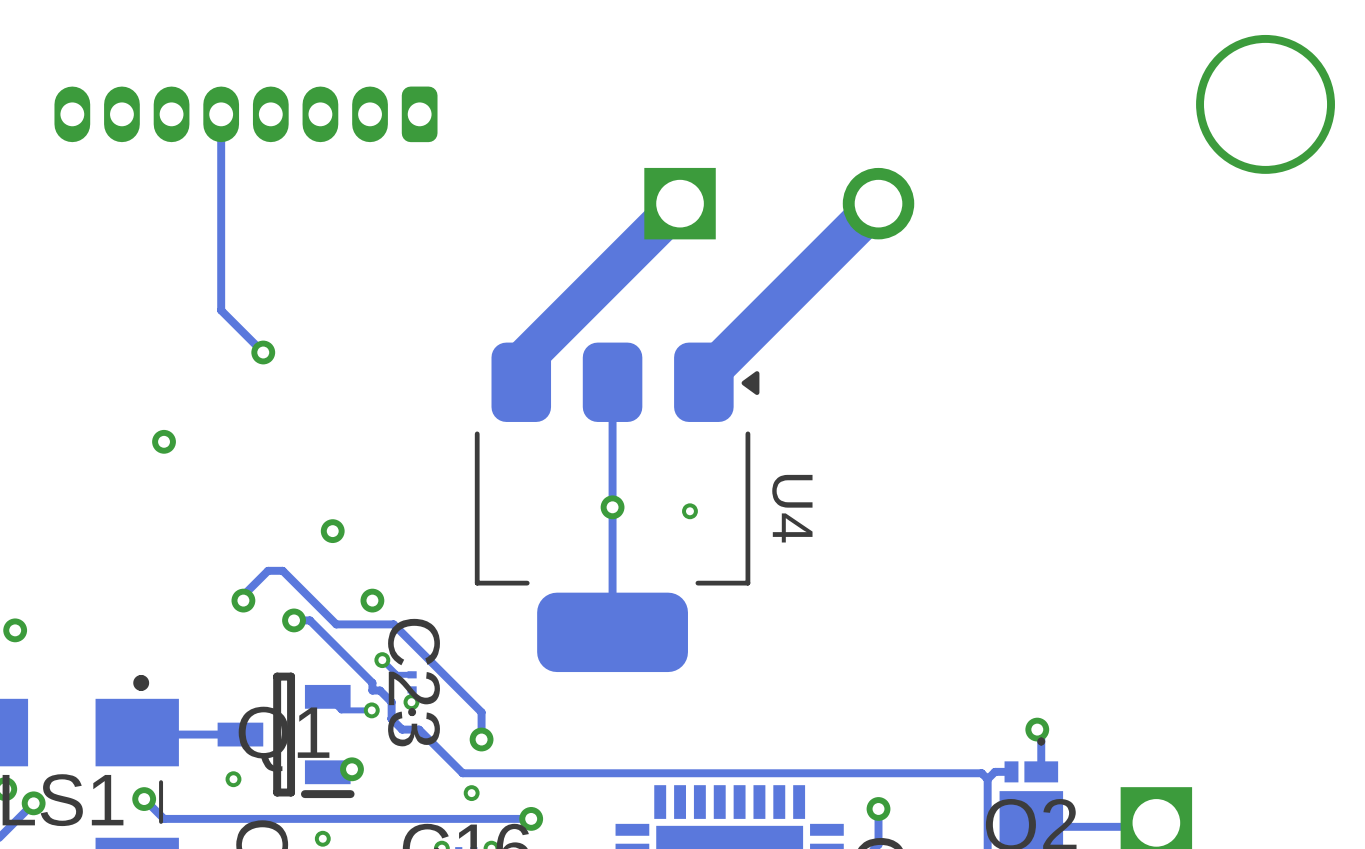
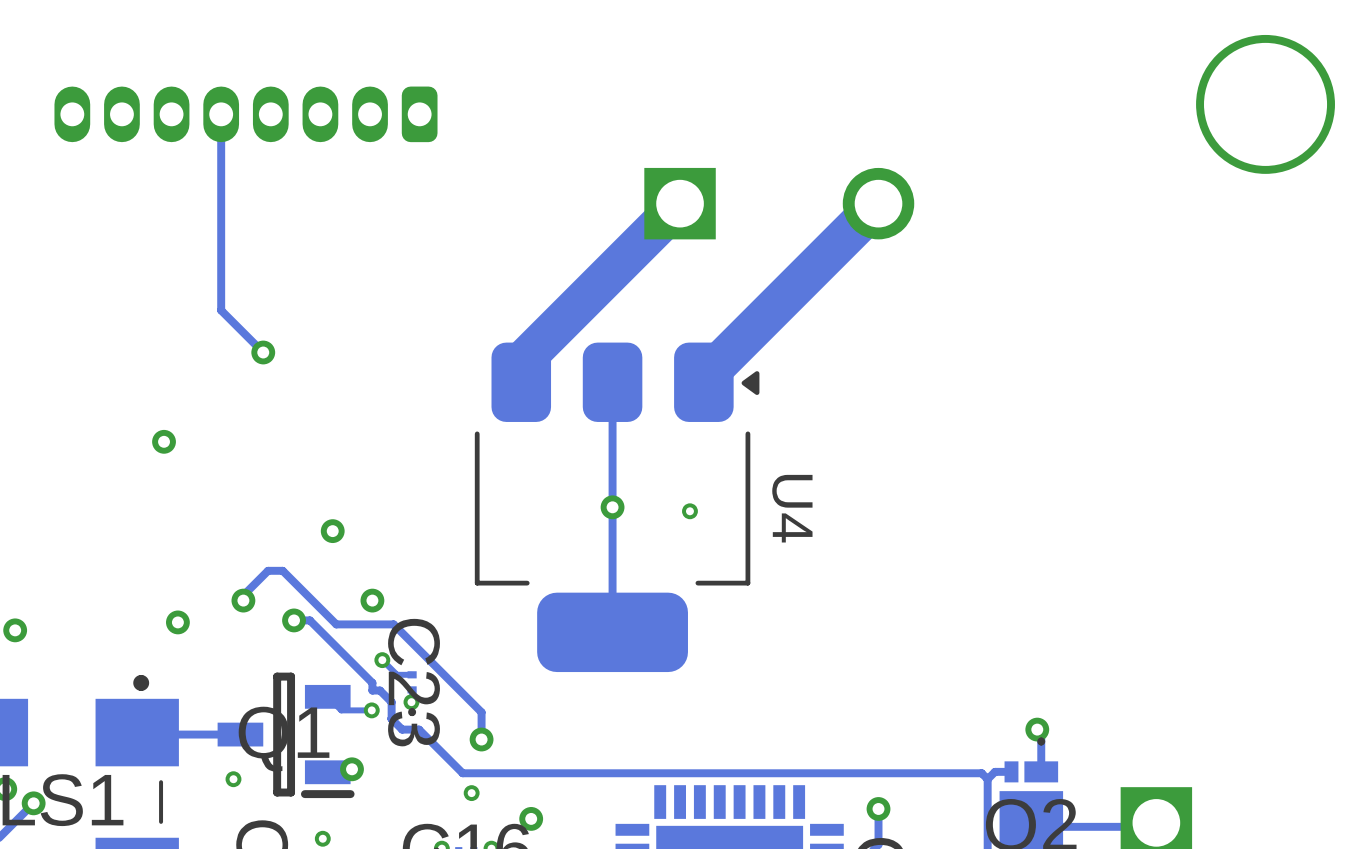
track: (144, 799) (164, 818) (531, 818) -> none
via position: (144, 799) -> (177, 622)

